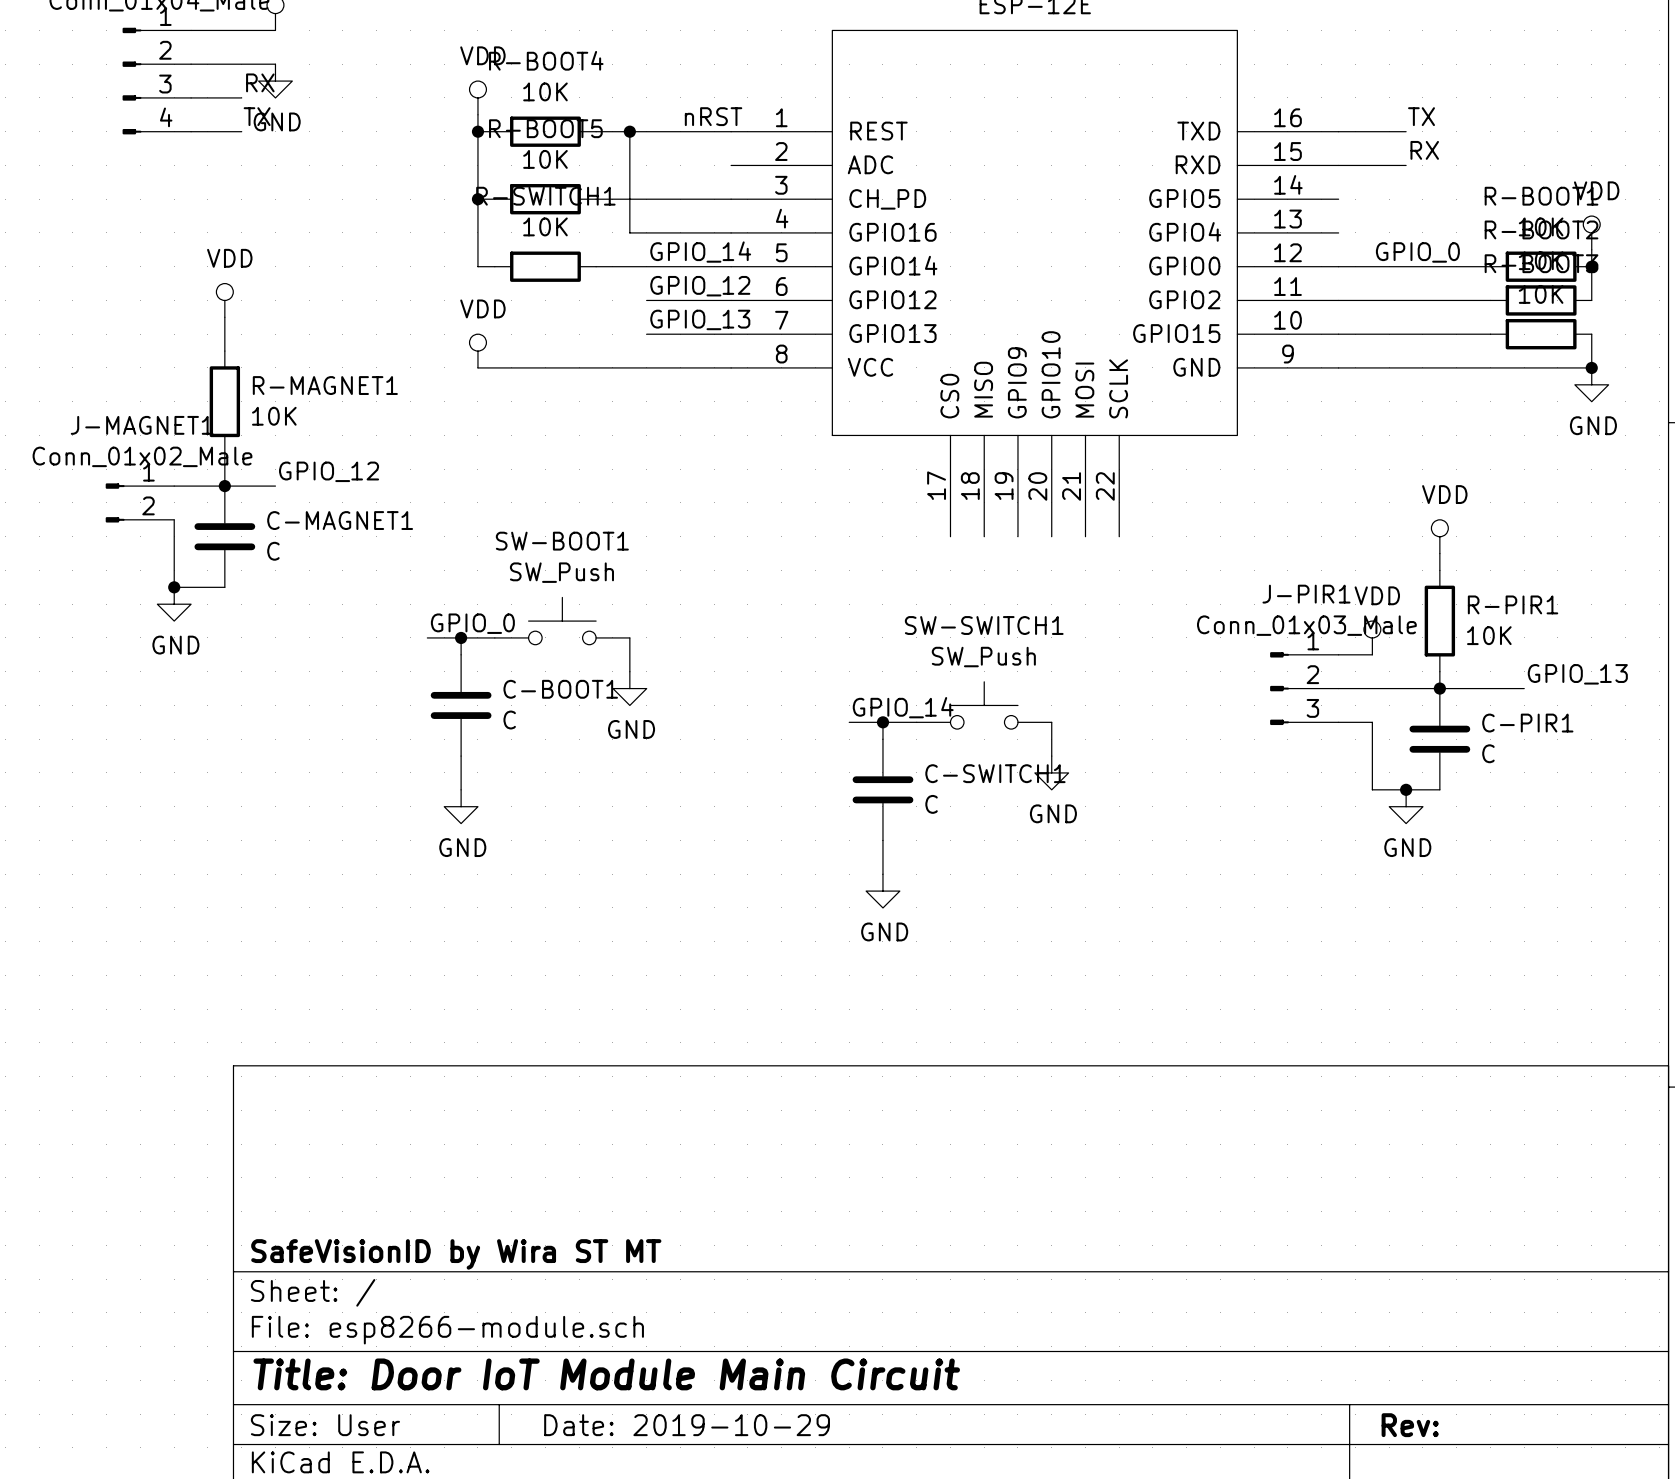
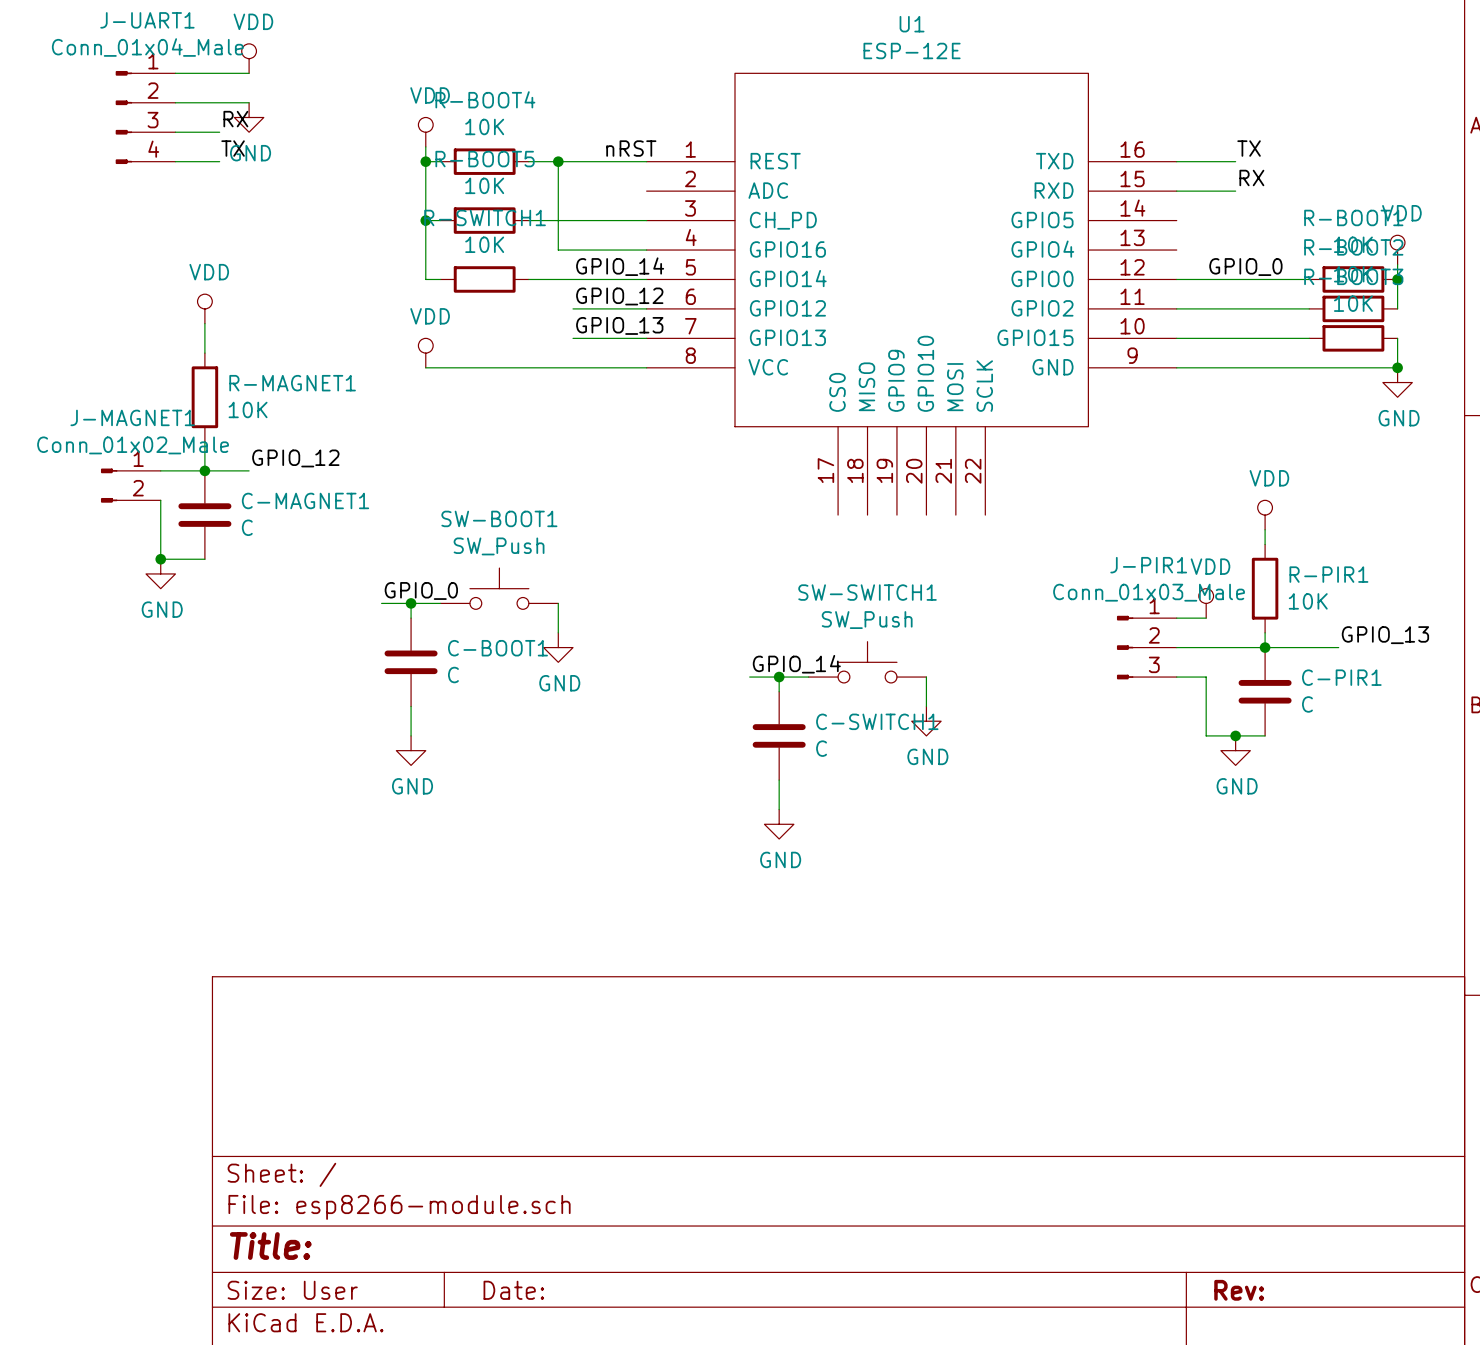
title block: SafeVisionID by Wira ST MT (456, 1254) -> none
title block: Title: Door IoT Module Main Circuit (606, 1374) -> Title: (270, 1246)
title block: Date: 2019-10-29 (687, 1425) -> Date: (513, 1290)

